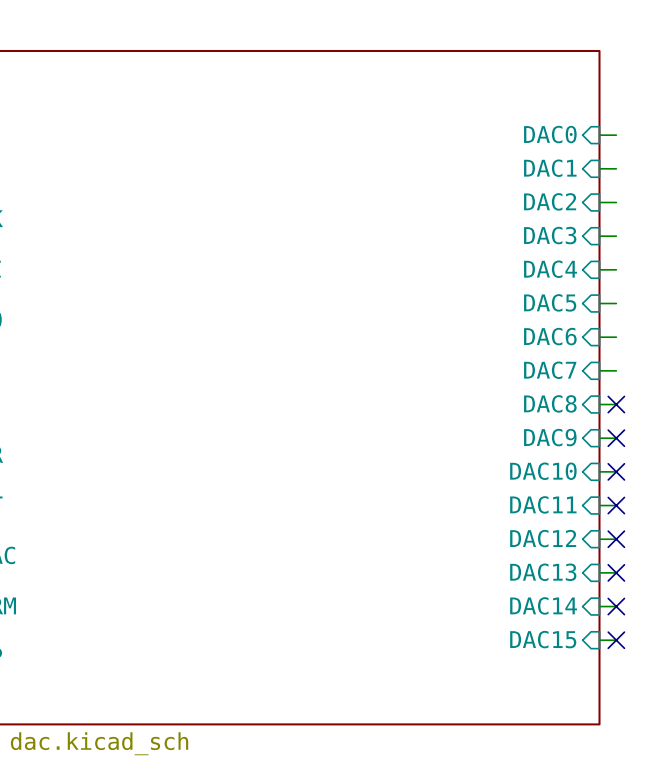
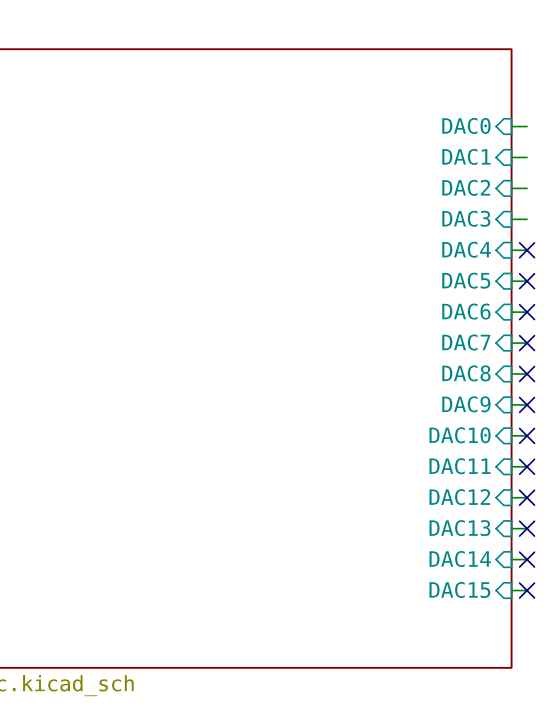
no-connect mark: none -> (527, 250)
no-connect mark: none -> (527, 281)
no-connect mark: none -> (527, 312)
no-connect mark: none -> (527, 343)

